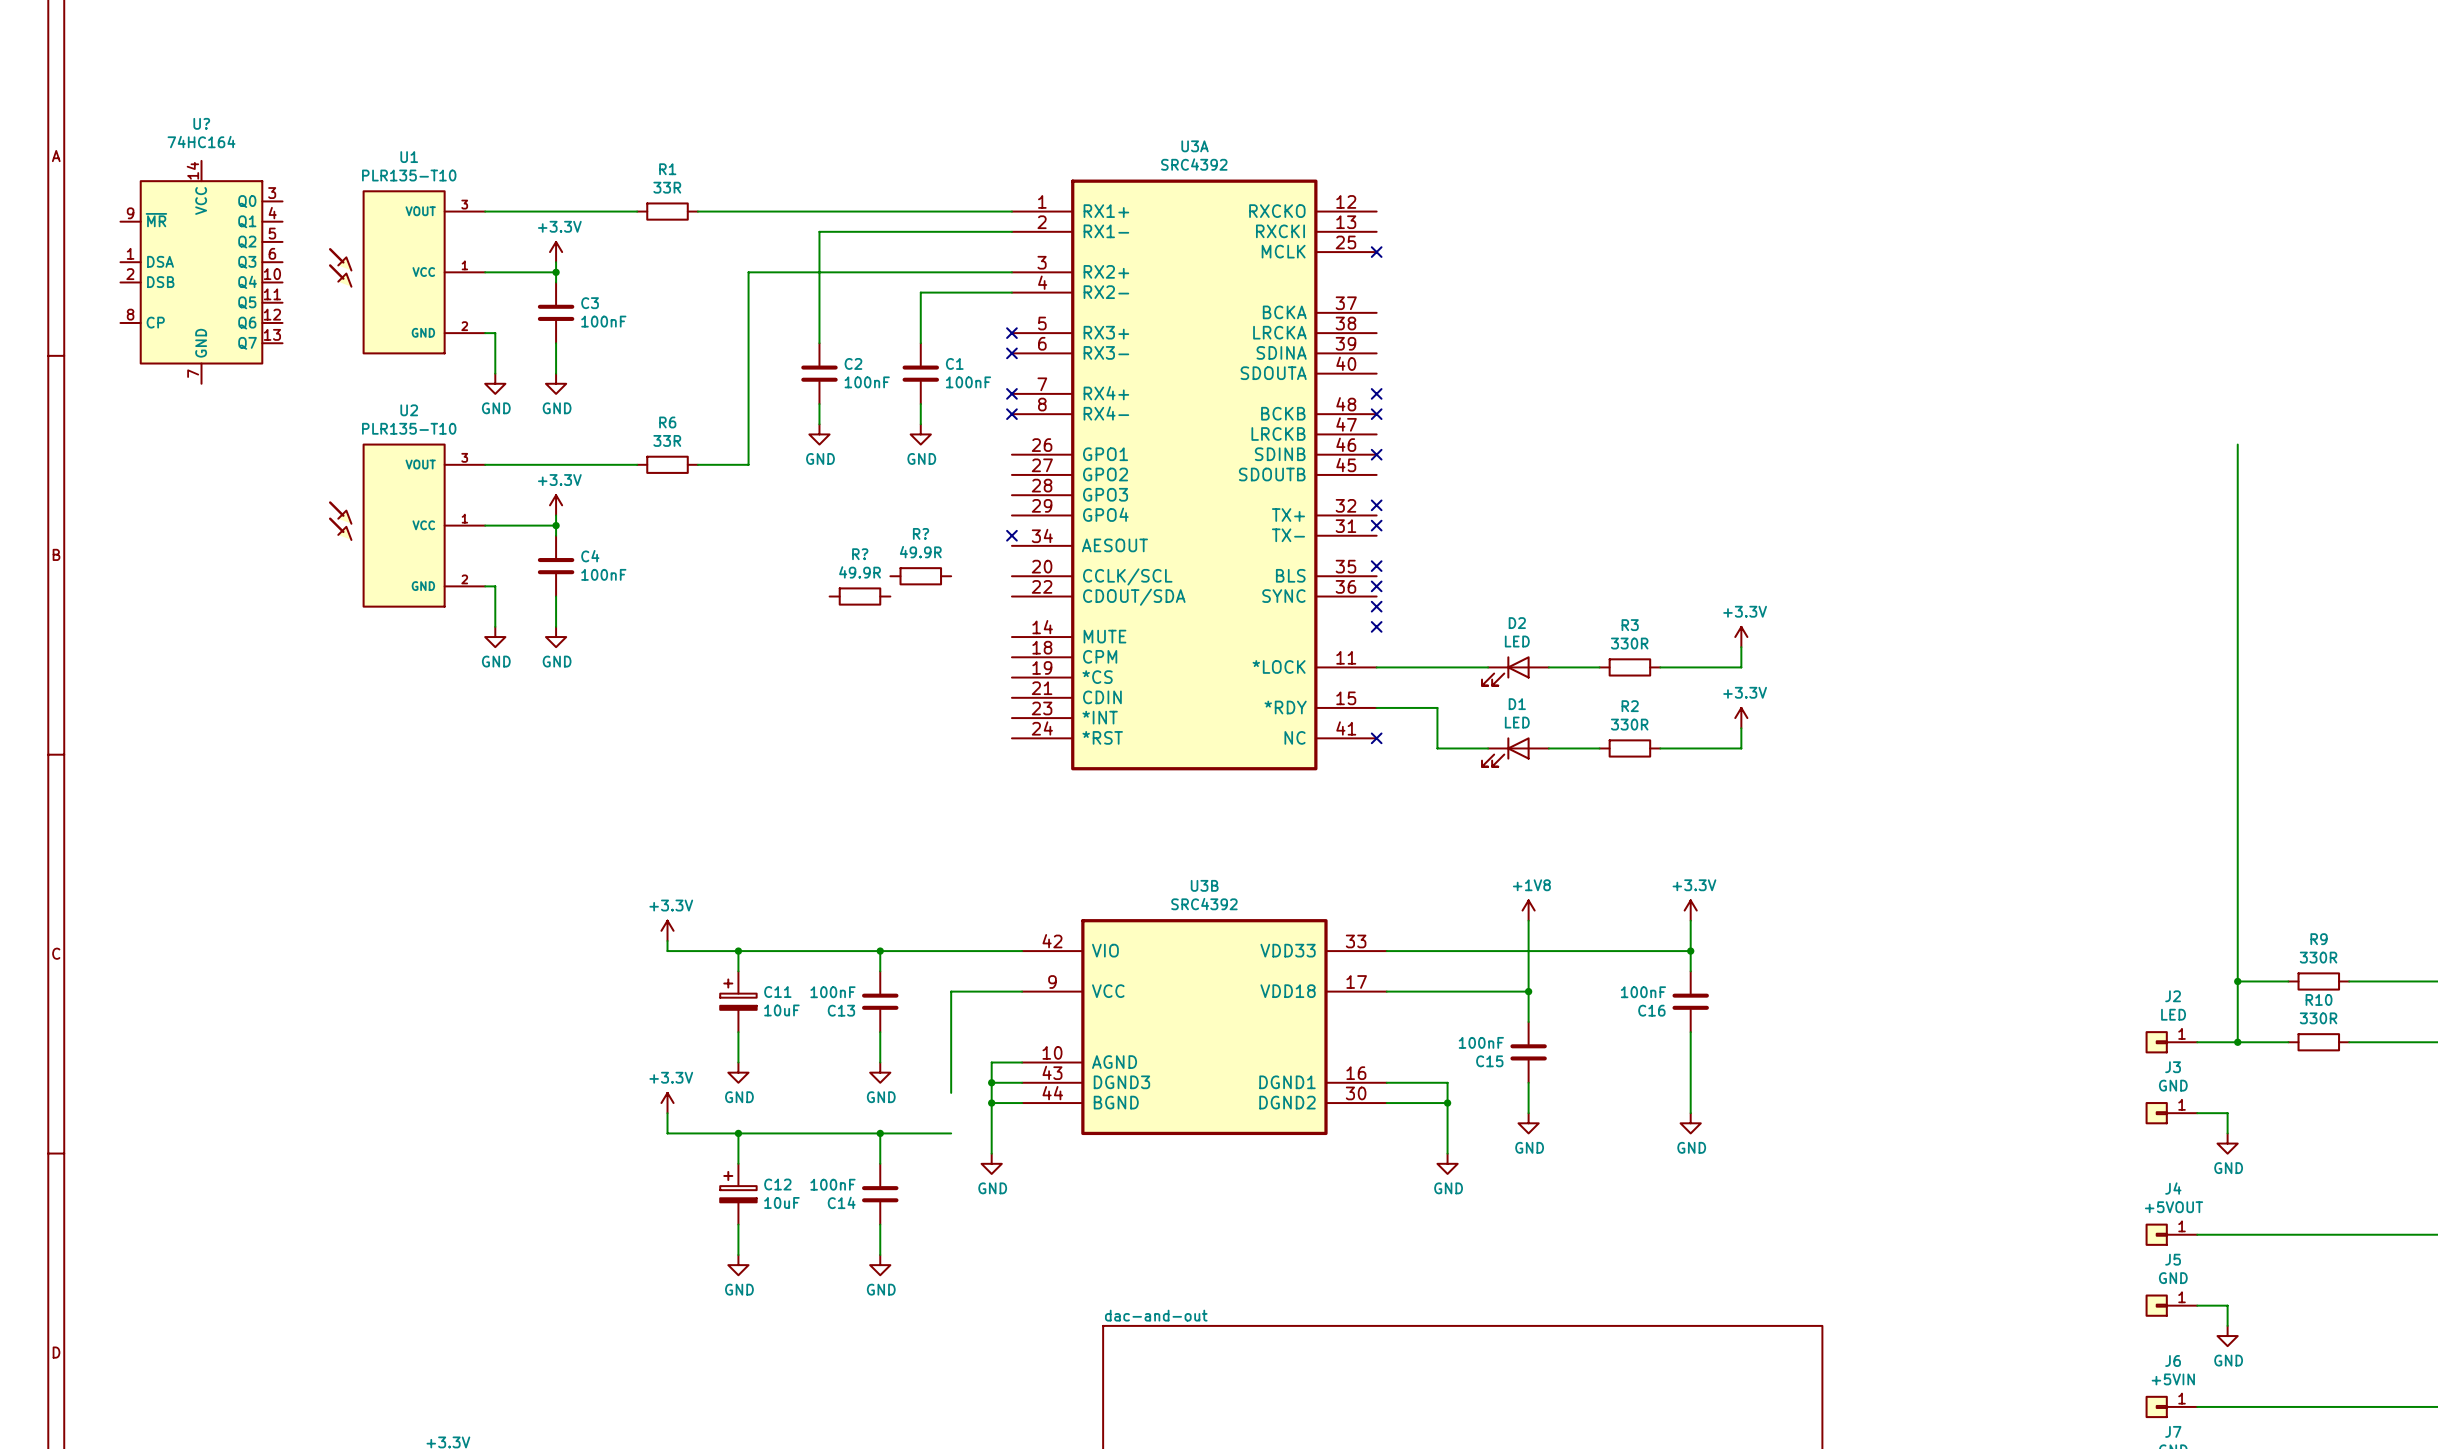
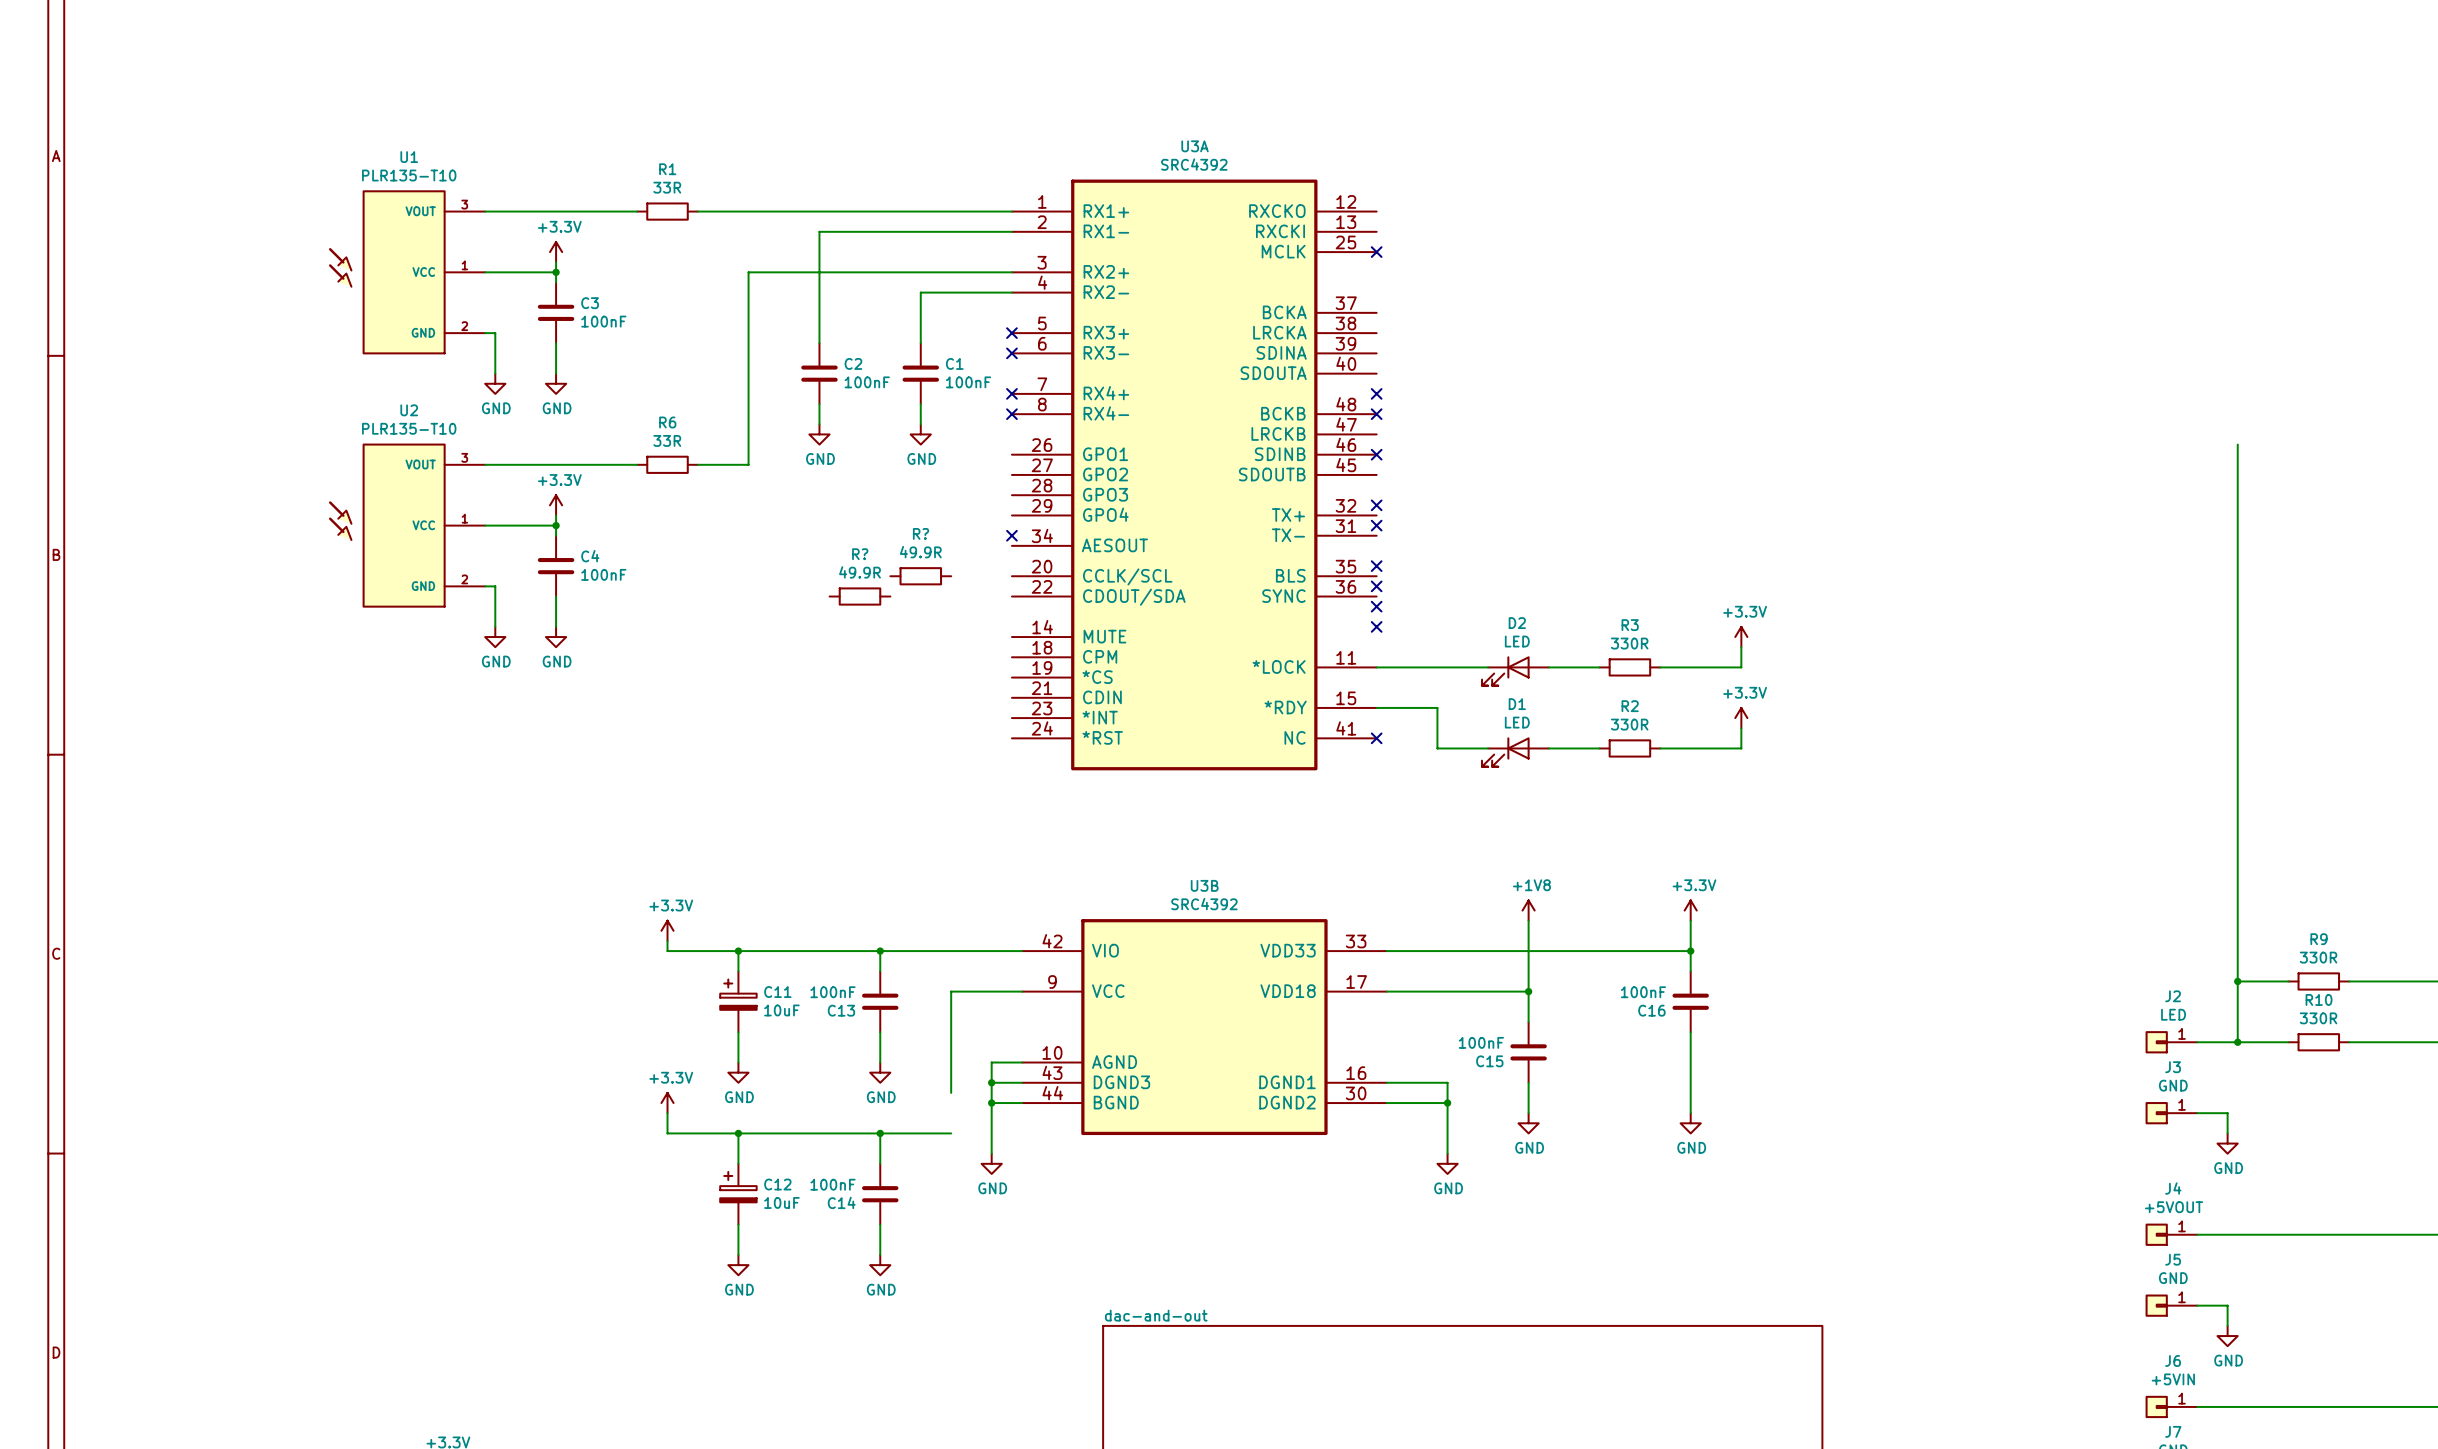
U?: 74HC164 (201, 272) -> none

